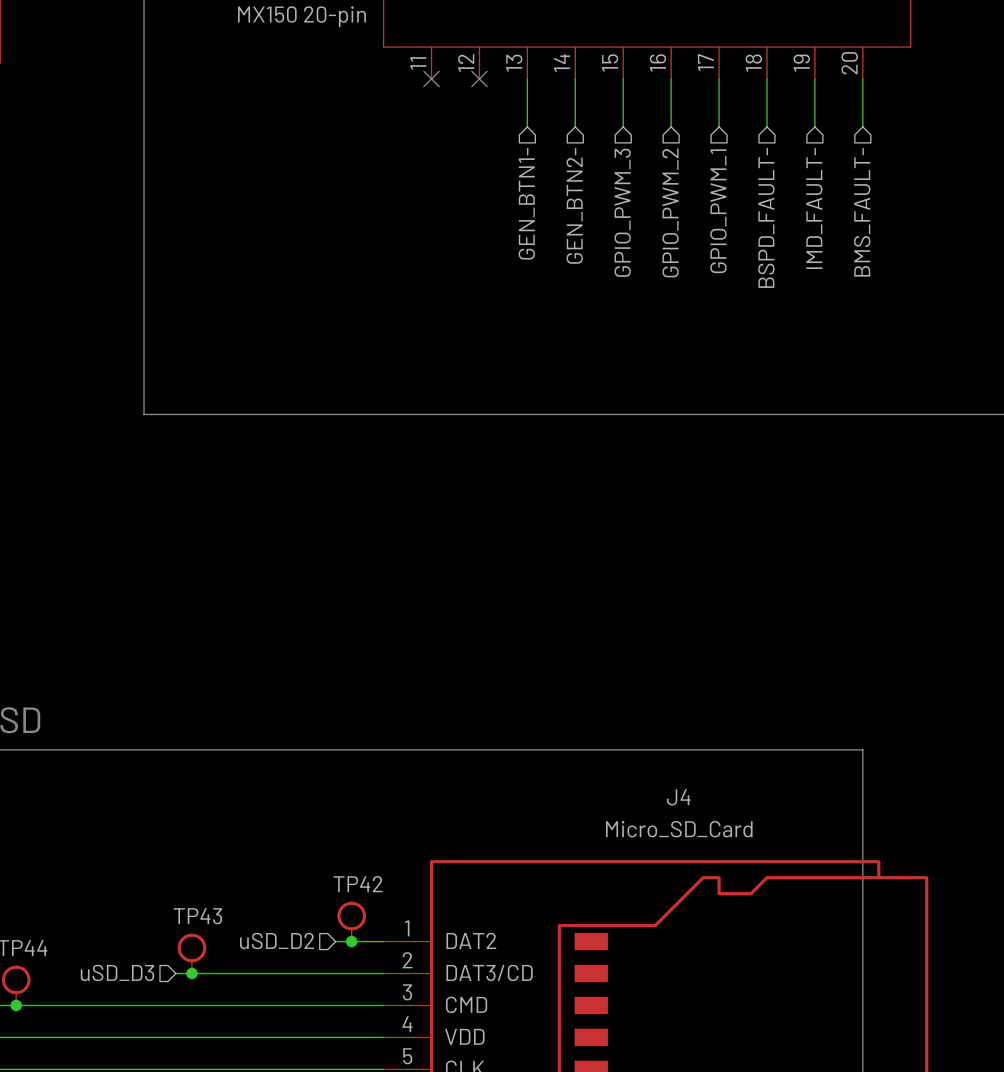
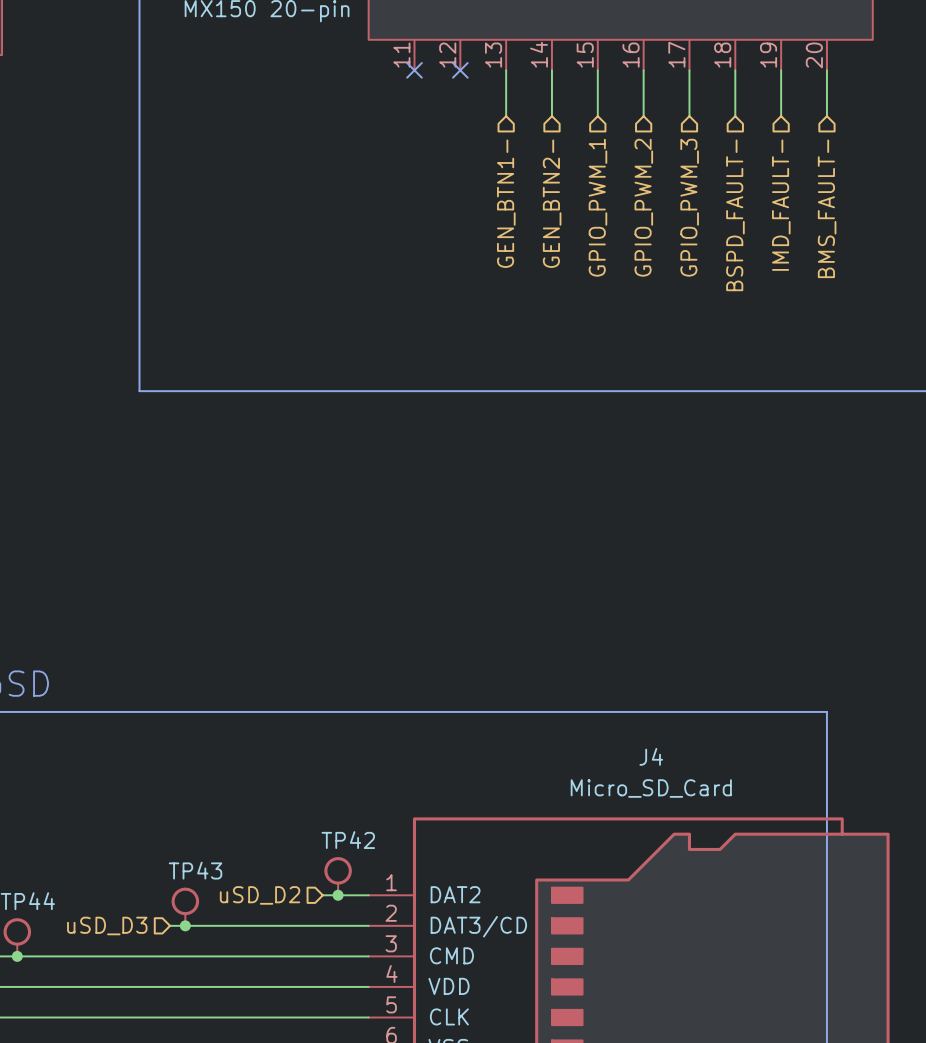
hierarchical label: GPIO_PWM_1 (718, 211) -> GPIO_PWM_3 (689, 207)
hierarchical label: GPIO_PWM_3 (622, 212) -> GPIO_PWM_1 (597, 207)

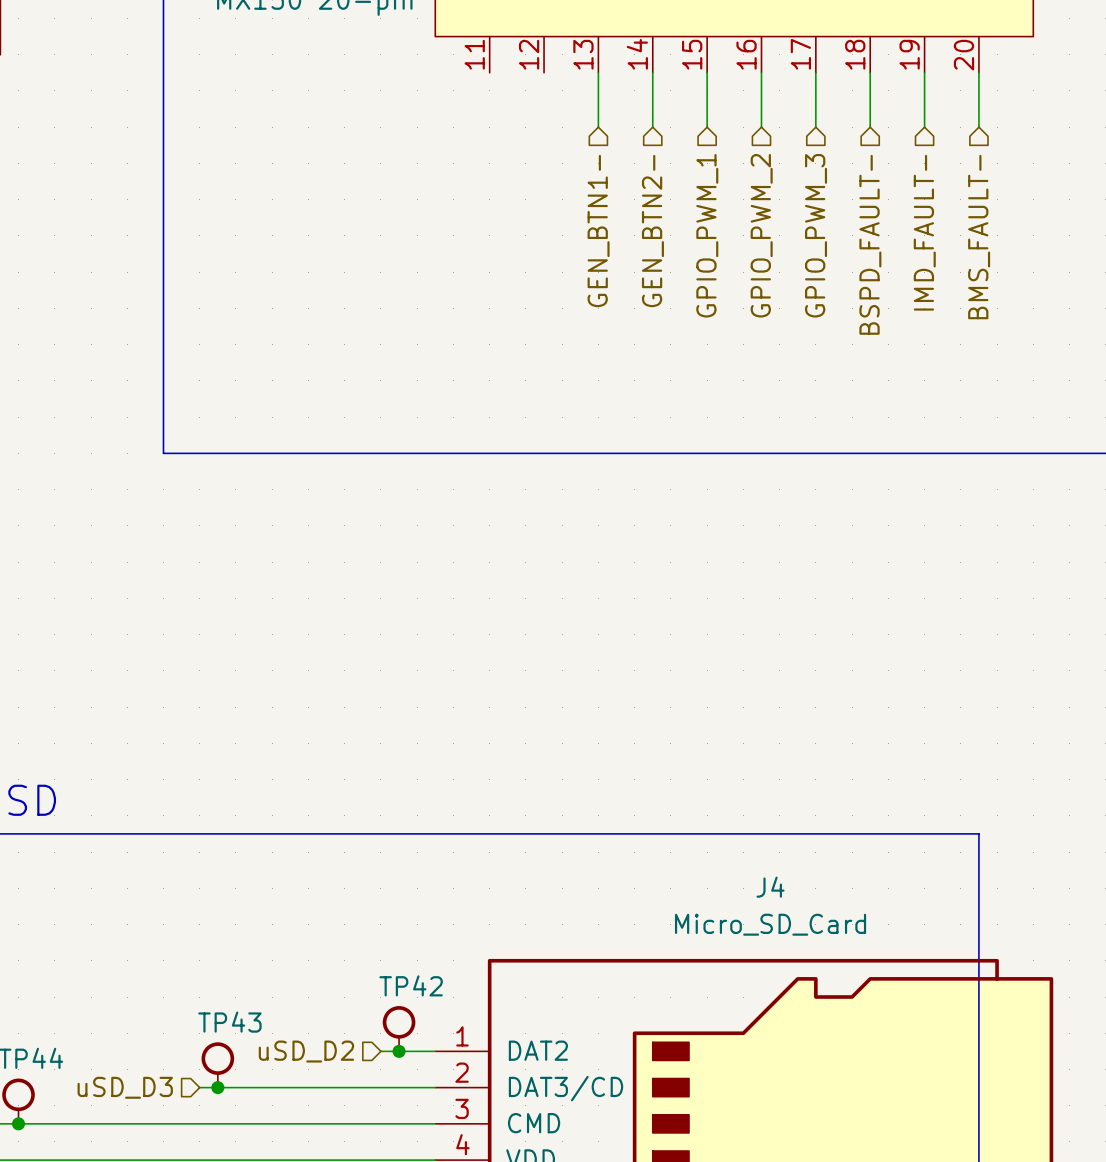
no-connect mark: (414, 70) -> none
no-connect mark: (460, 70) -> none

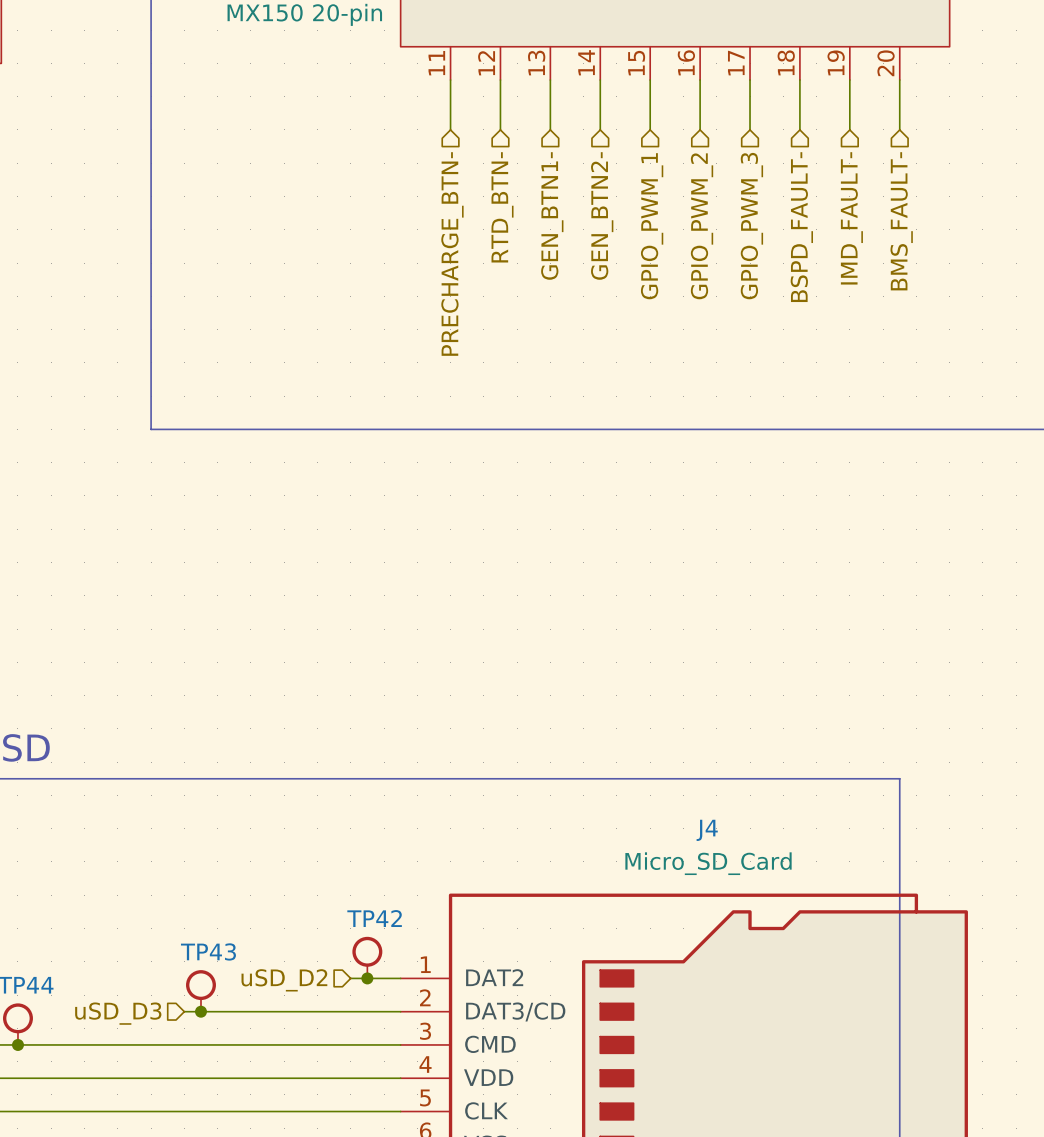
wire: none -> (450, 80) (450, 129)
wire: none -> (500, 80) (500, 129)
hierarchical label: none -> RTD_BTN- (502, 207)
hierarchical label: none -> PRECHARGE_BTN- (452, 254)

